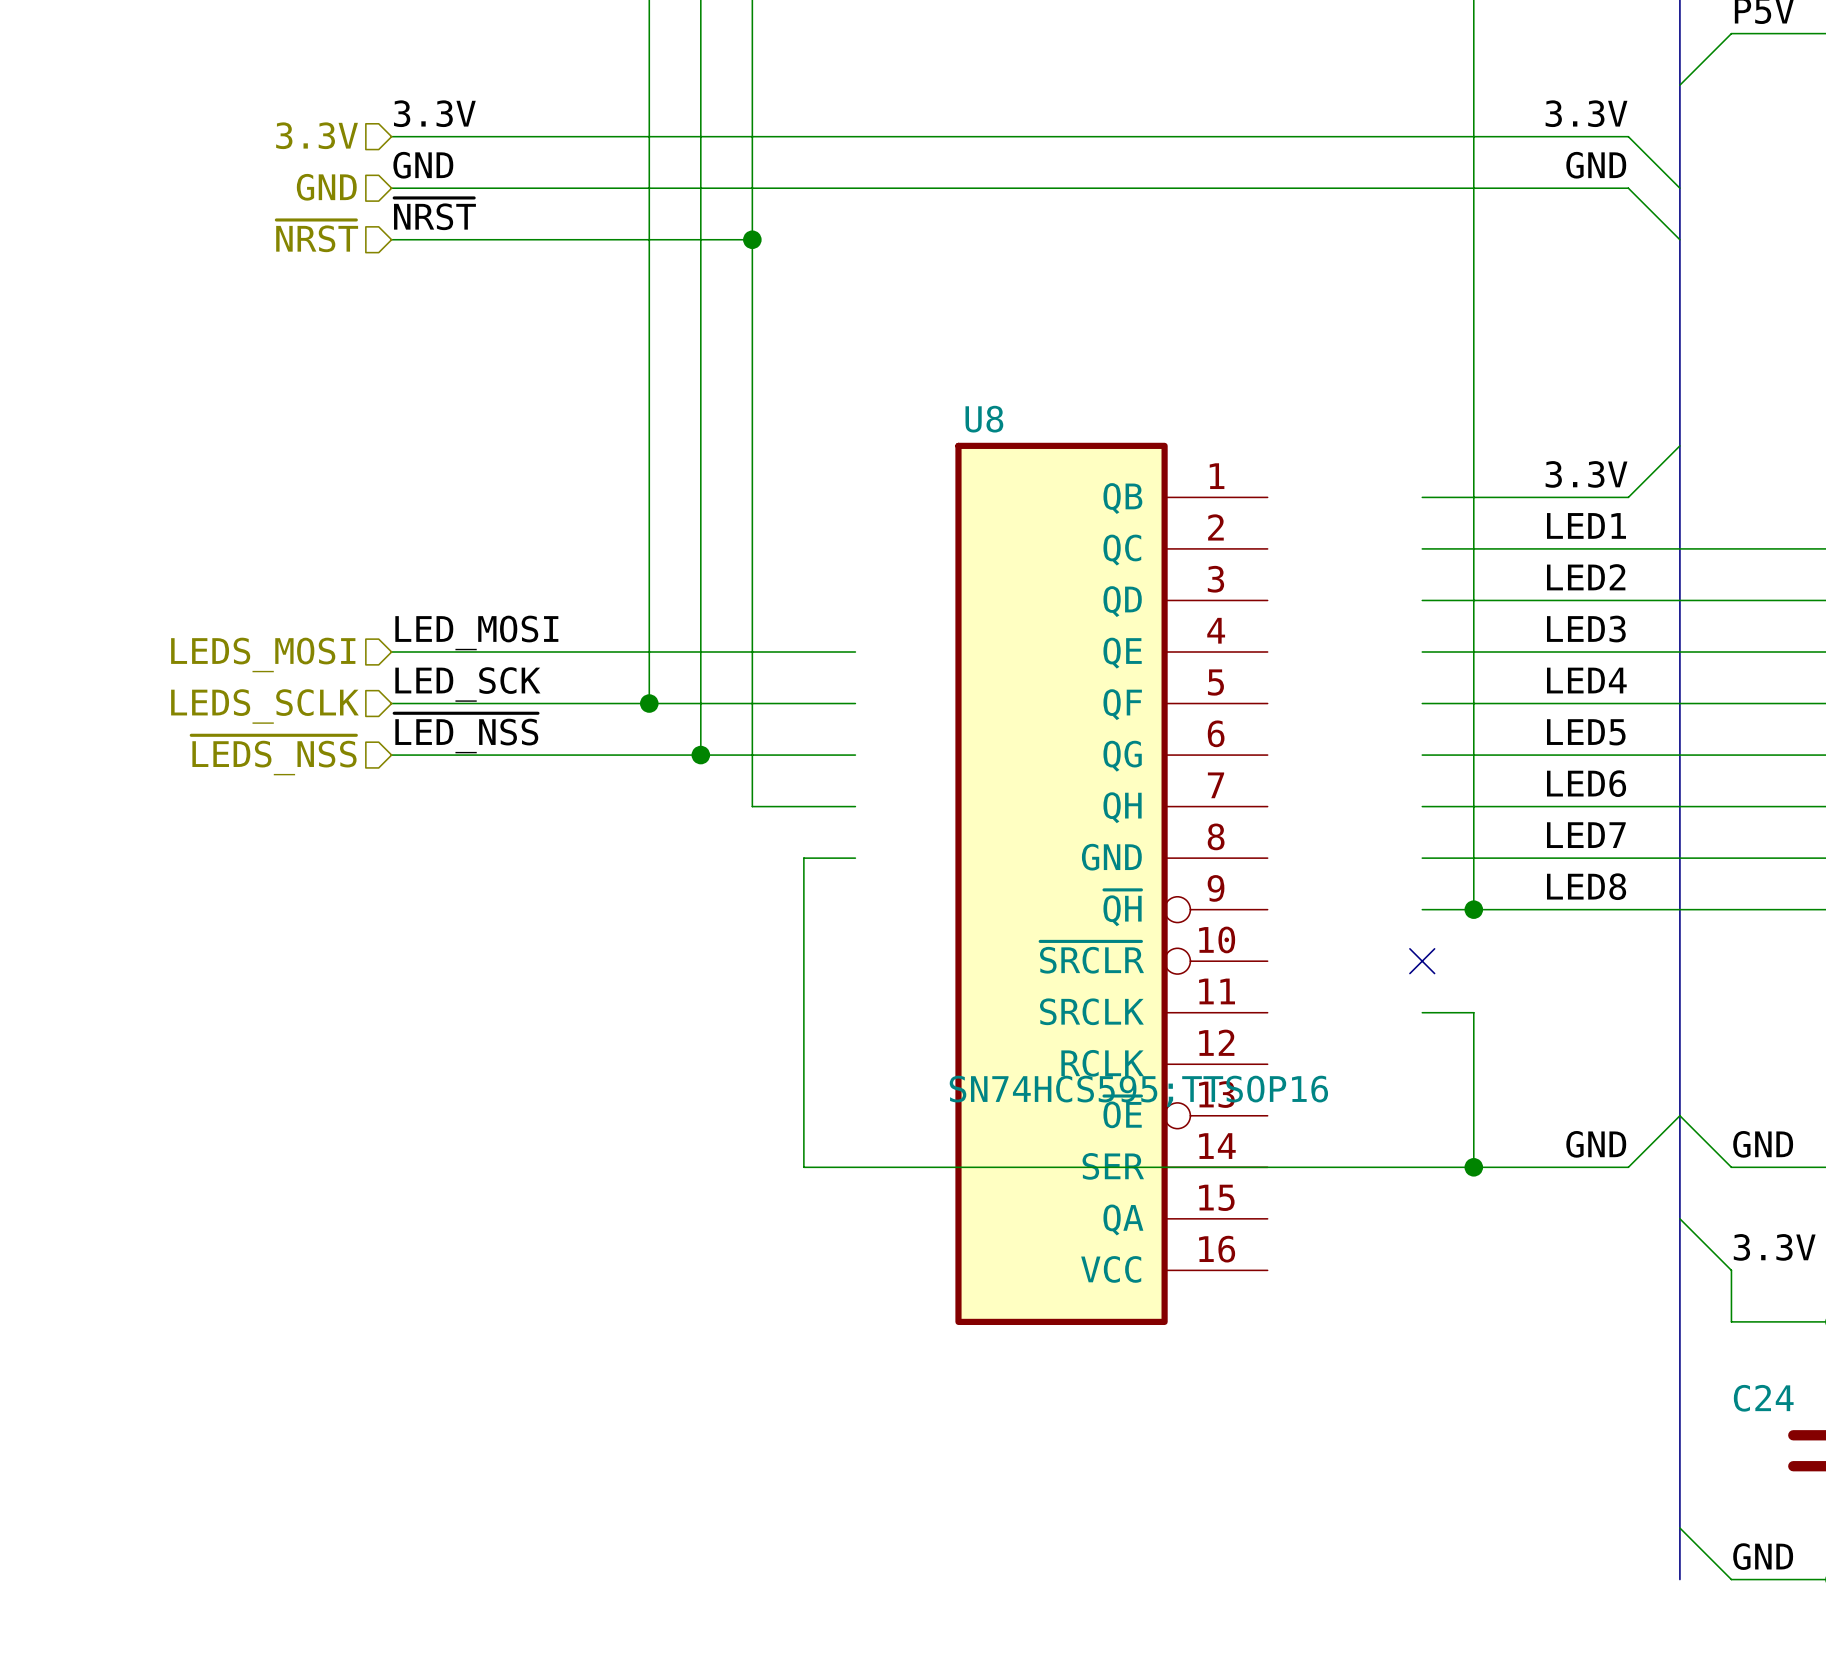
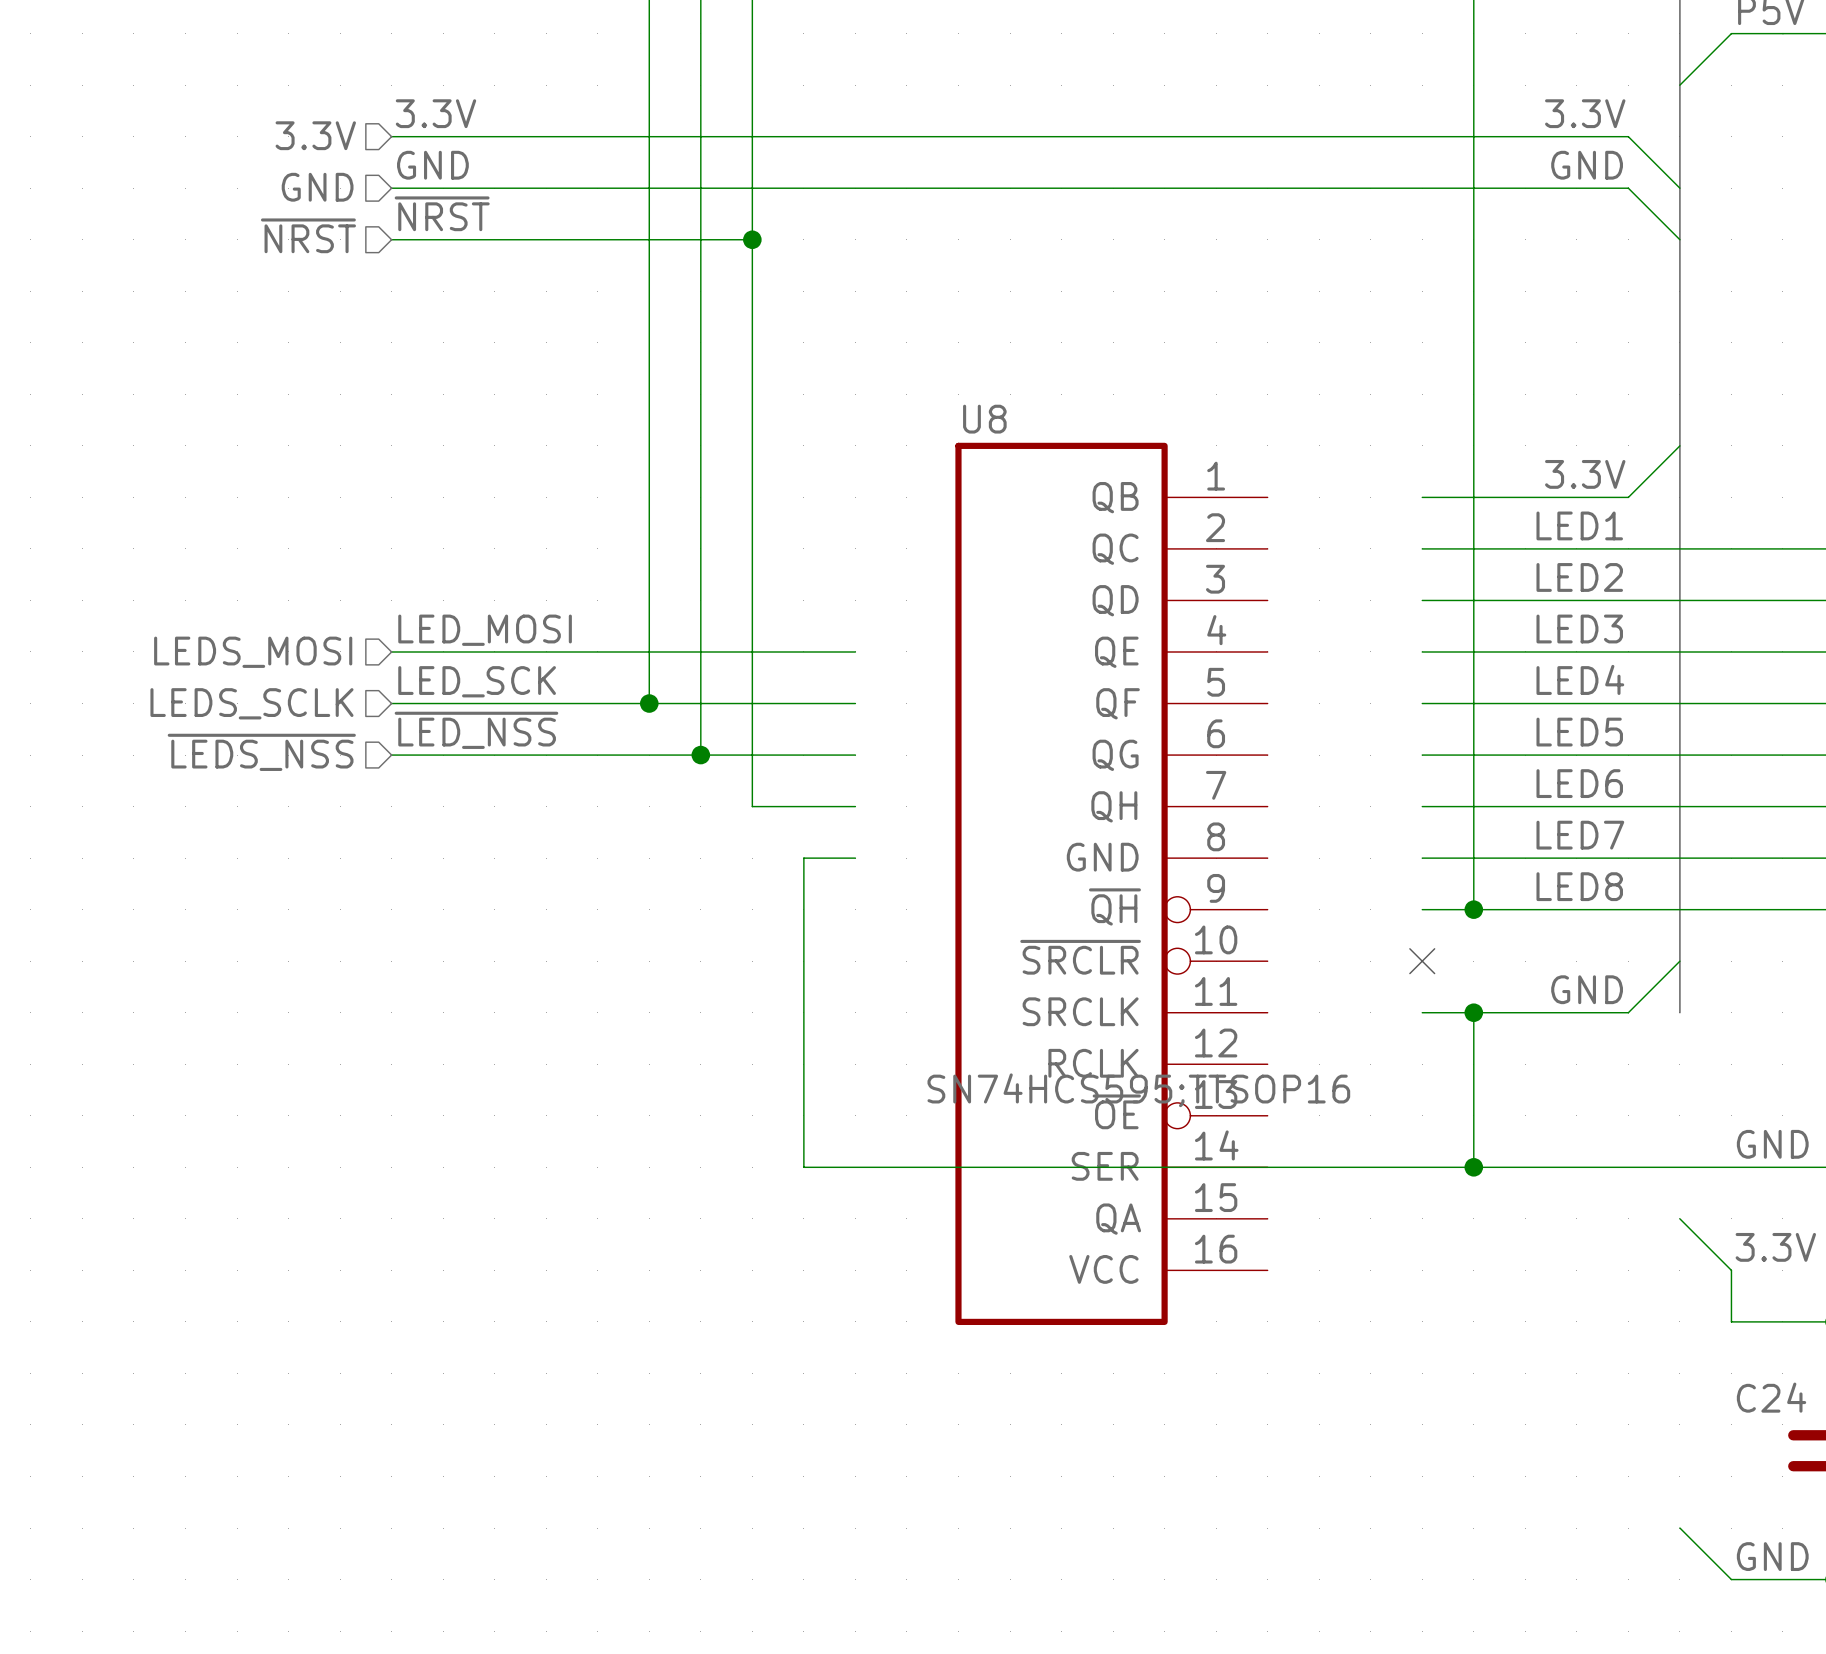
wire: none -> (1679, 961) (1628, 1012) (1473, 1012)
junction: none -> (1473, 1012)
bus: (1679, 1012) (1679, 1579) -> none
label position: GND (1596, 1144) -> GND (1587, 989)
wire: (1628, 1167) (1679, 1115) (1731, 1167) -> (1628, 1167) (1731, 1167)

